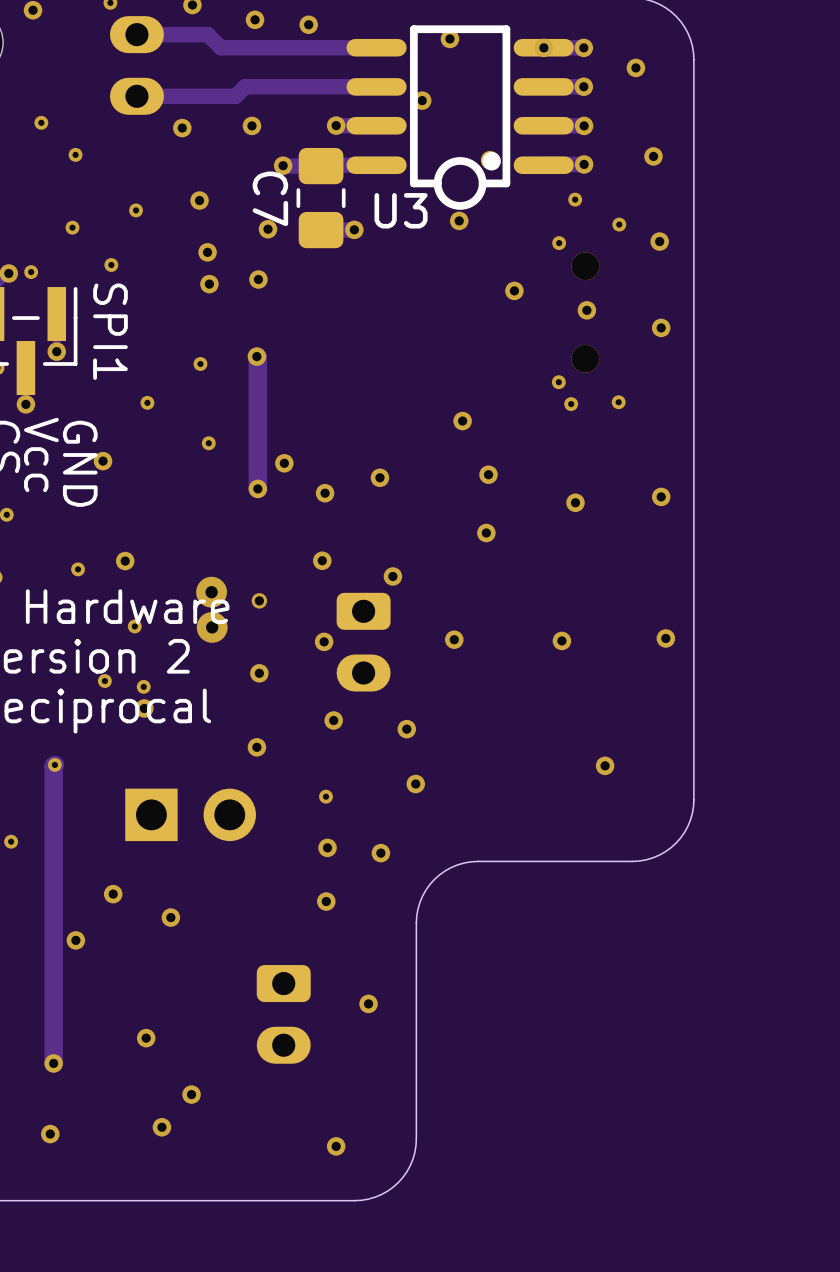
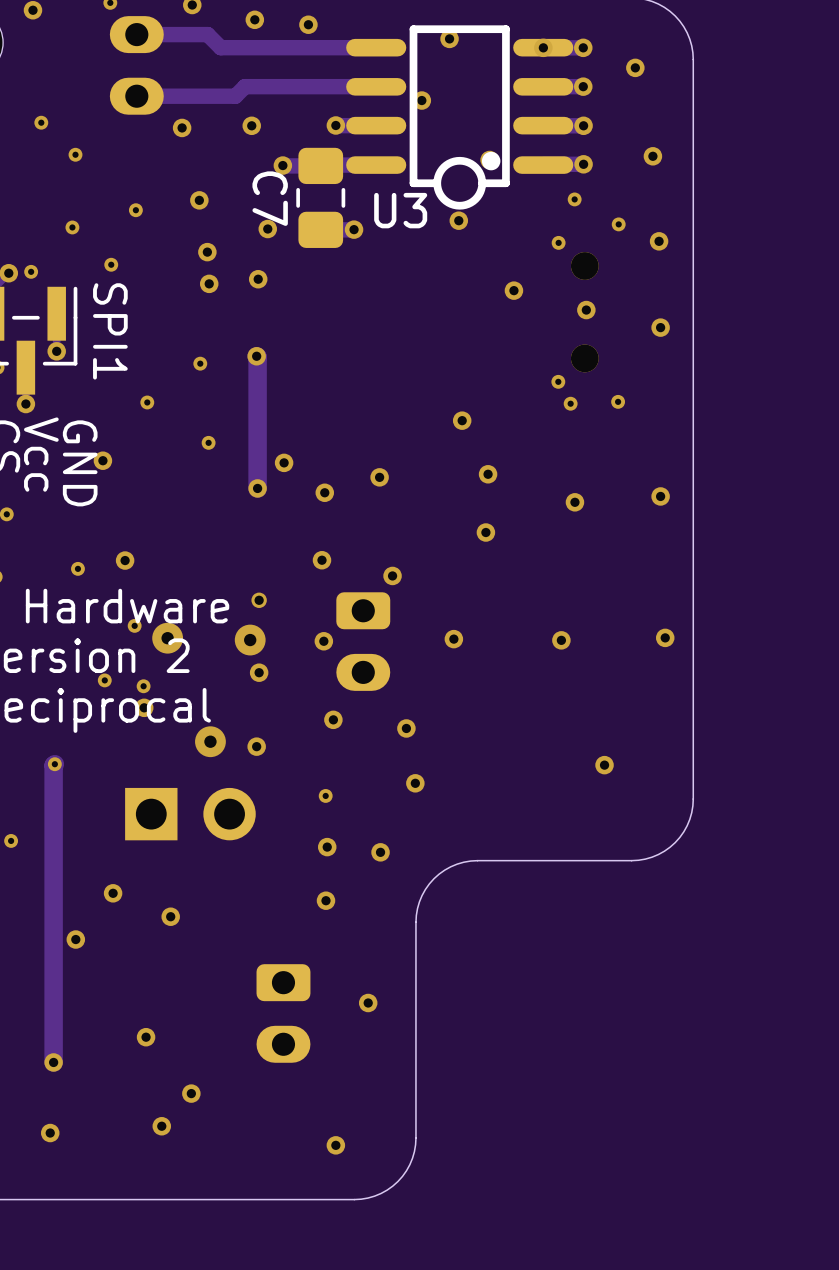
via: (211, 592) -> none
via: (212, 627) -> none
via: none -> (167, 638)
via: none -> (250, 640)
via: none -> (210, 741)

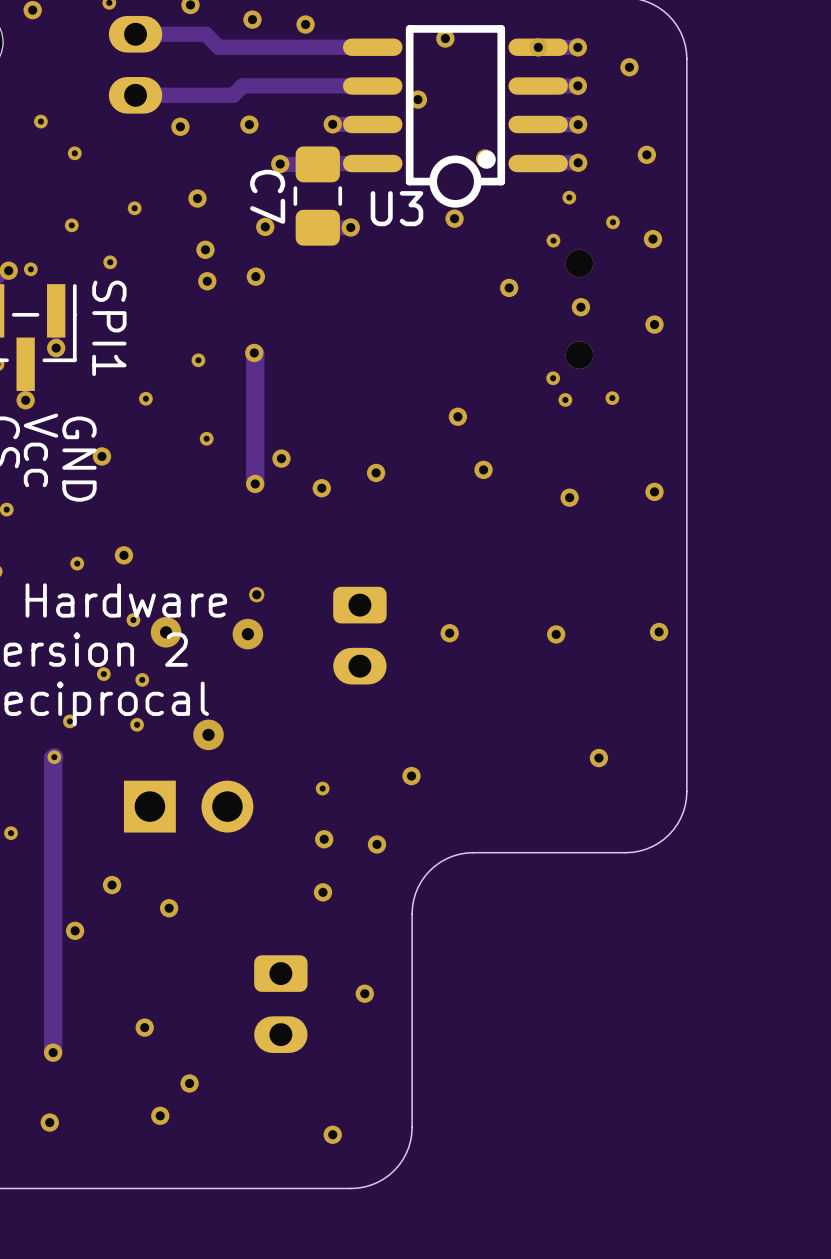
via: (485, 532) -> none
via: (321, 560) -> none
via: (392, 575) -> none
via: (323, 641) -> none
via: (259, 672) -> none
via: (144, 707) -> none
via: (333, 719) -> none
via: none -> (69, 721)
via: (406, 728) -> none
via: none -> (137, 724)
via: (256, 746) -> none

